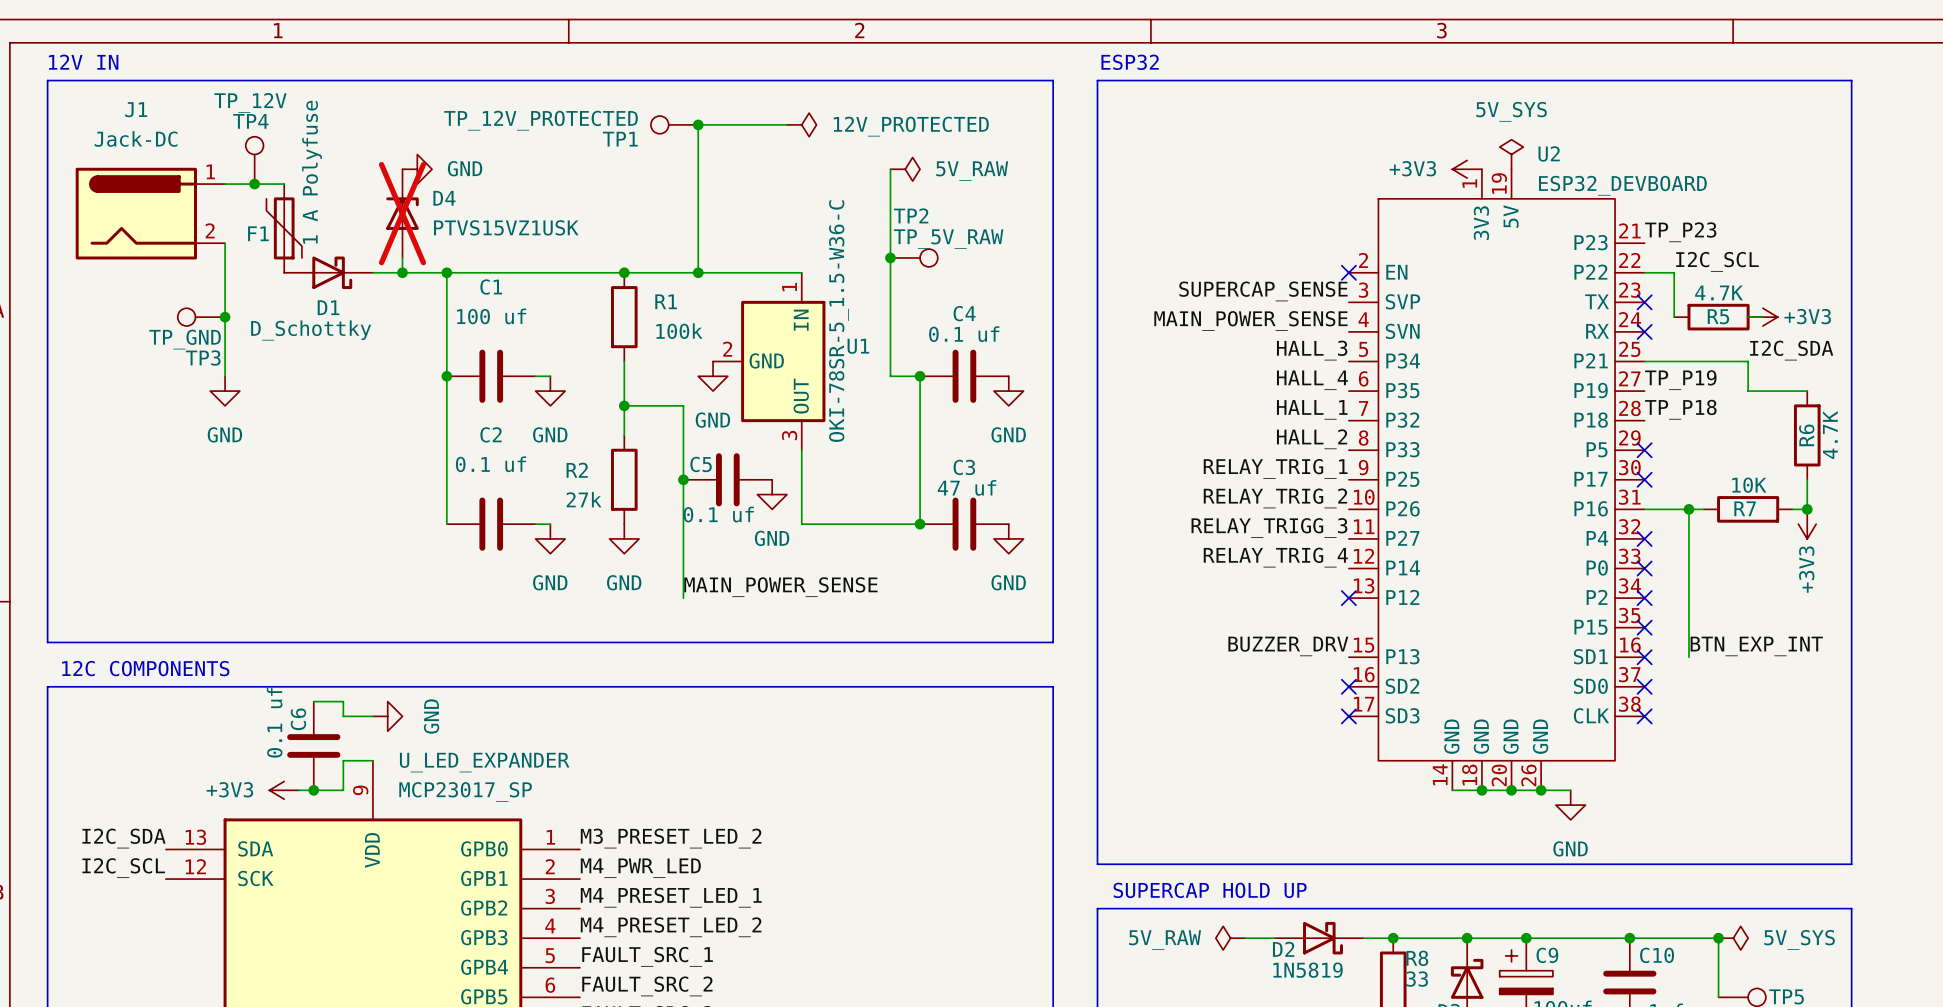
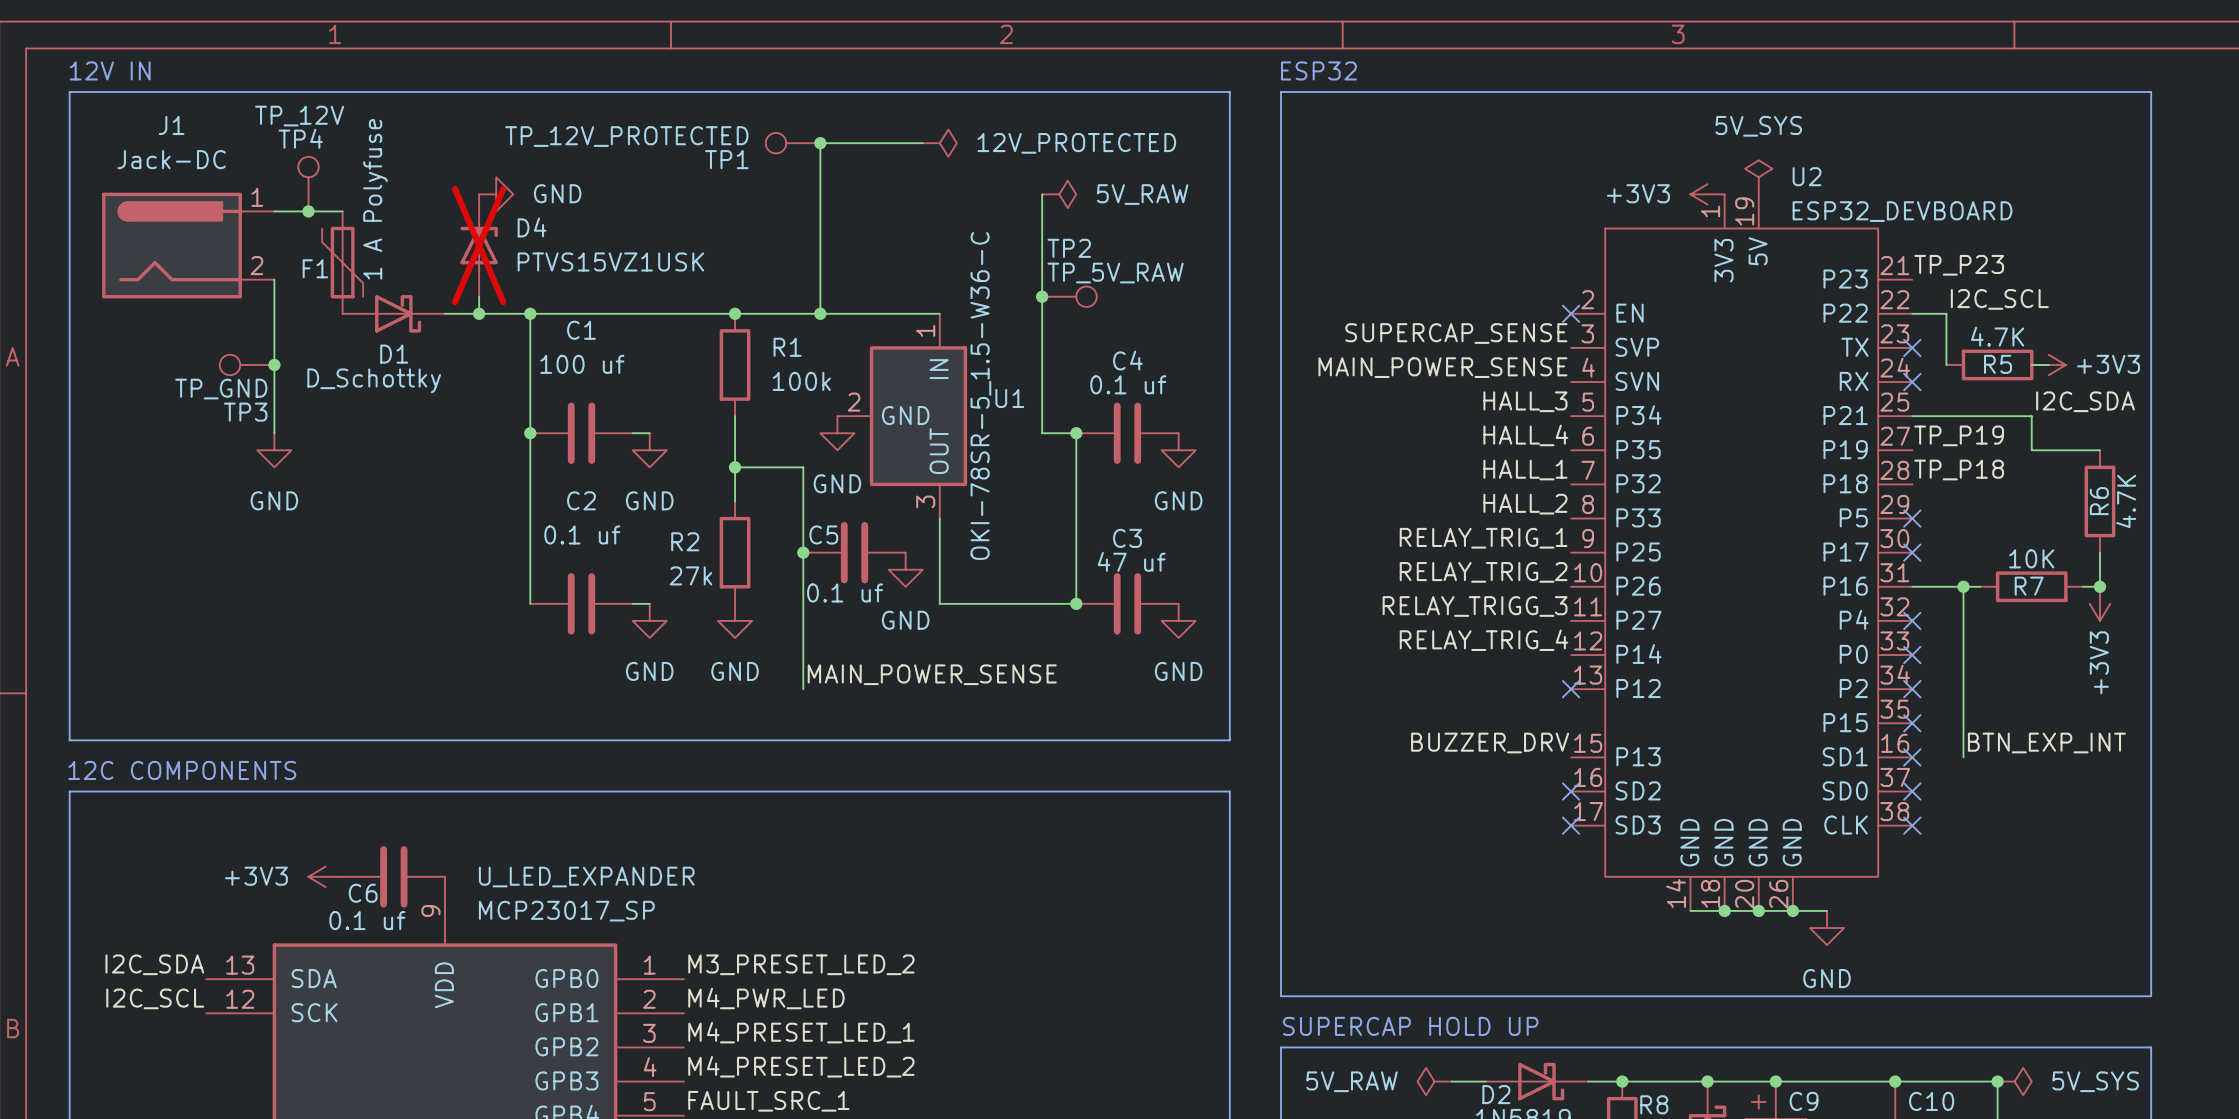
wire: (313, 701) (343, 701) (343, 716) (372, 716) -> none
power symbol: GND (387, 716) -> none
C6 name position: C6 (298, 719) -> C6 (363, 893)
C6 value position: 0.1 uf (274, 722) -> 0.1 uf (367, 920)
C6 rotation: 0° (313, 745) -> 90° clockwise (393, 876)
wire: (372, 760) (343, 760) (343, 790) (298, 790) -> none
power symbol position: +3V3 (284, 790) -> +3V3 (325, 876)
junction: (313, 790) -> none

